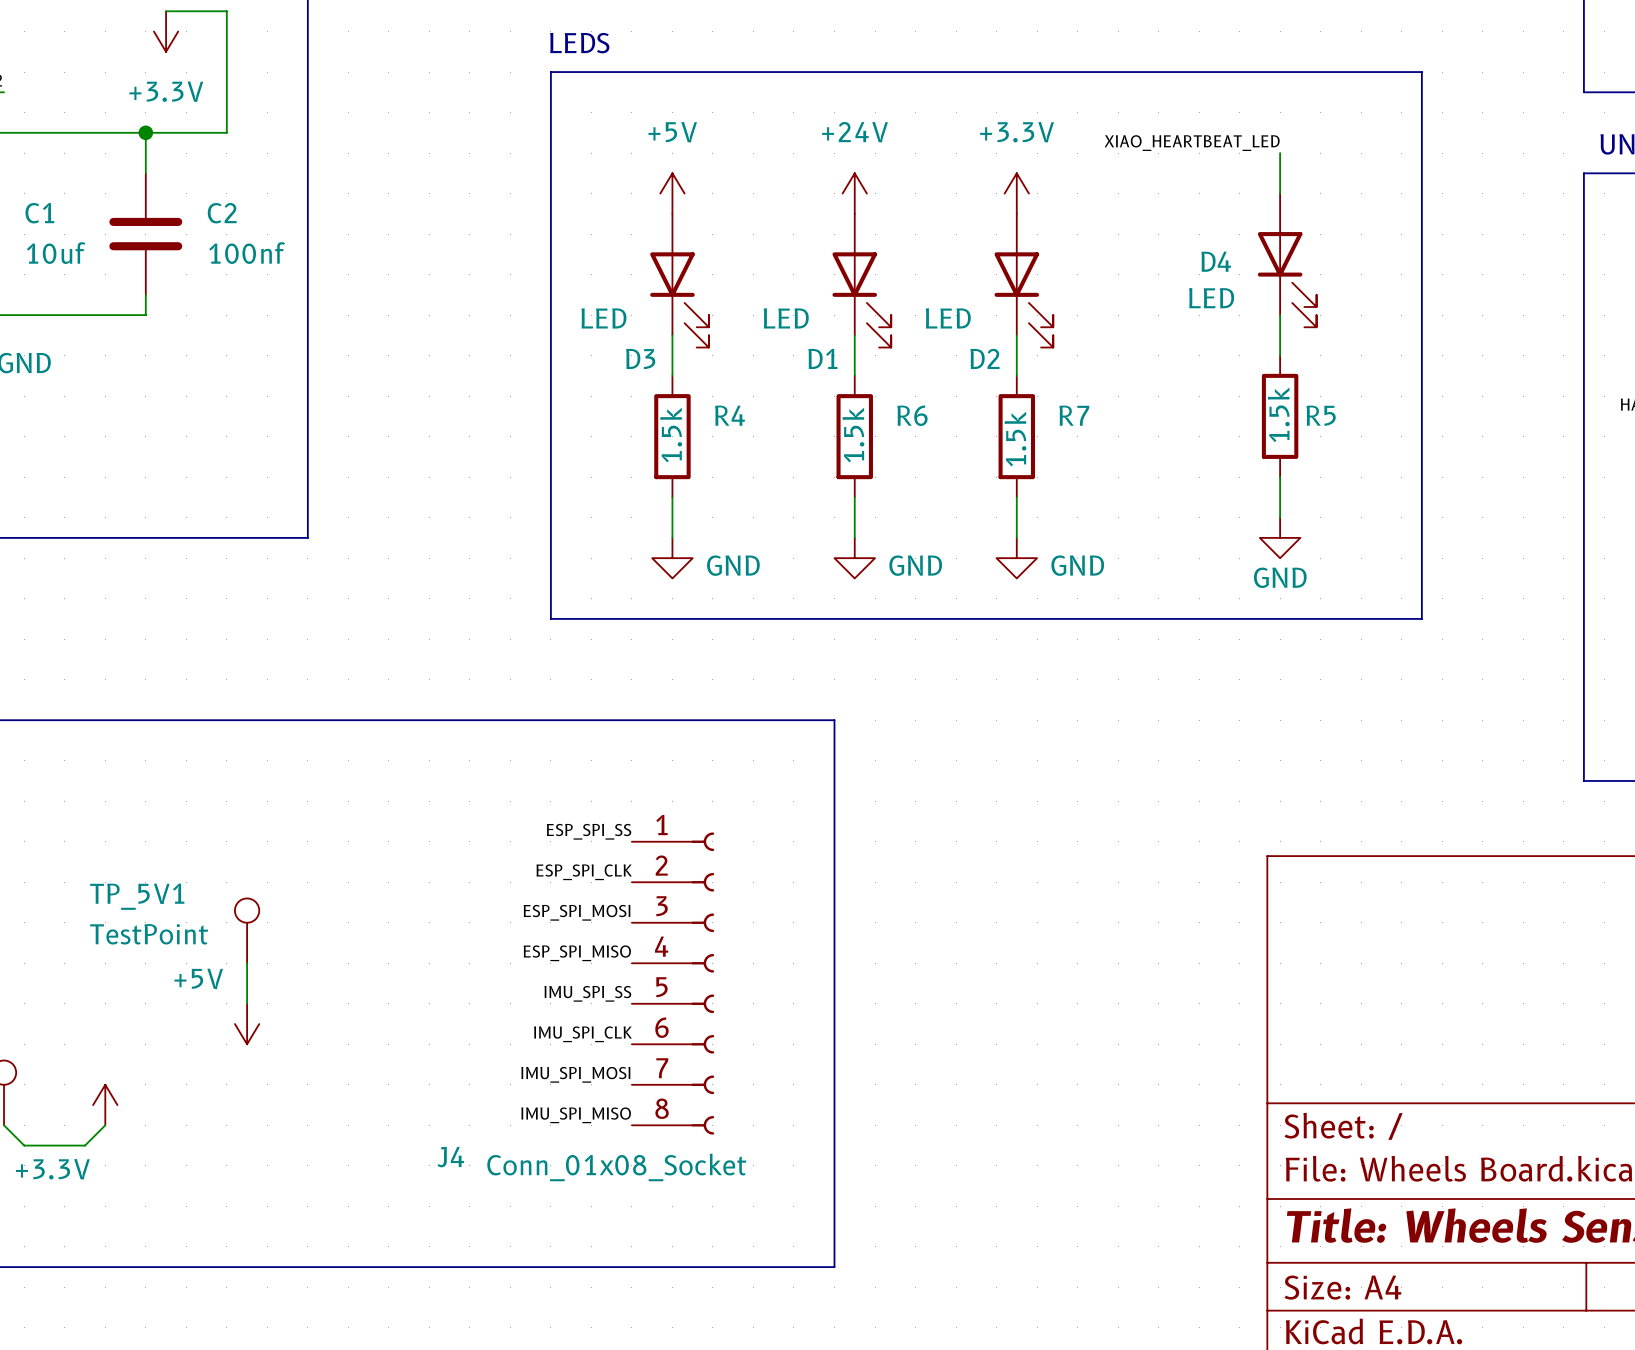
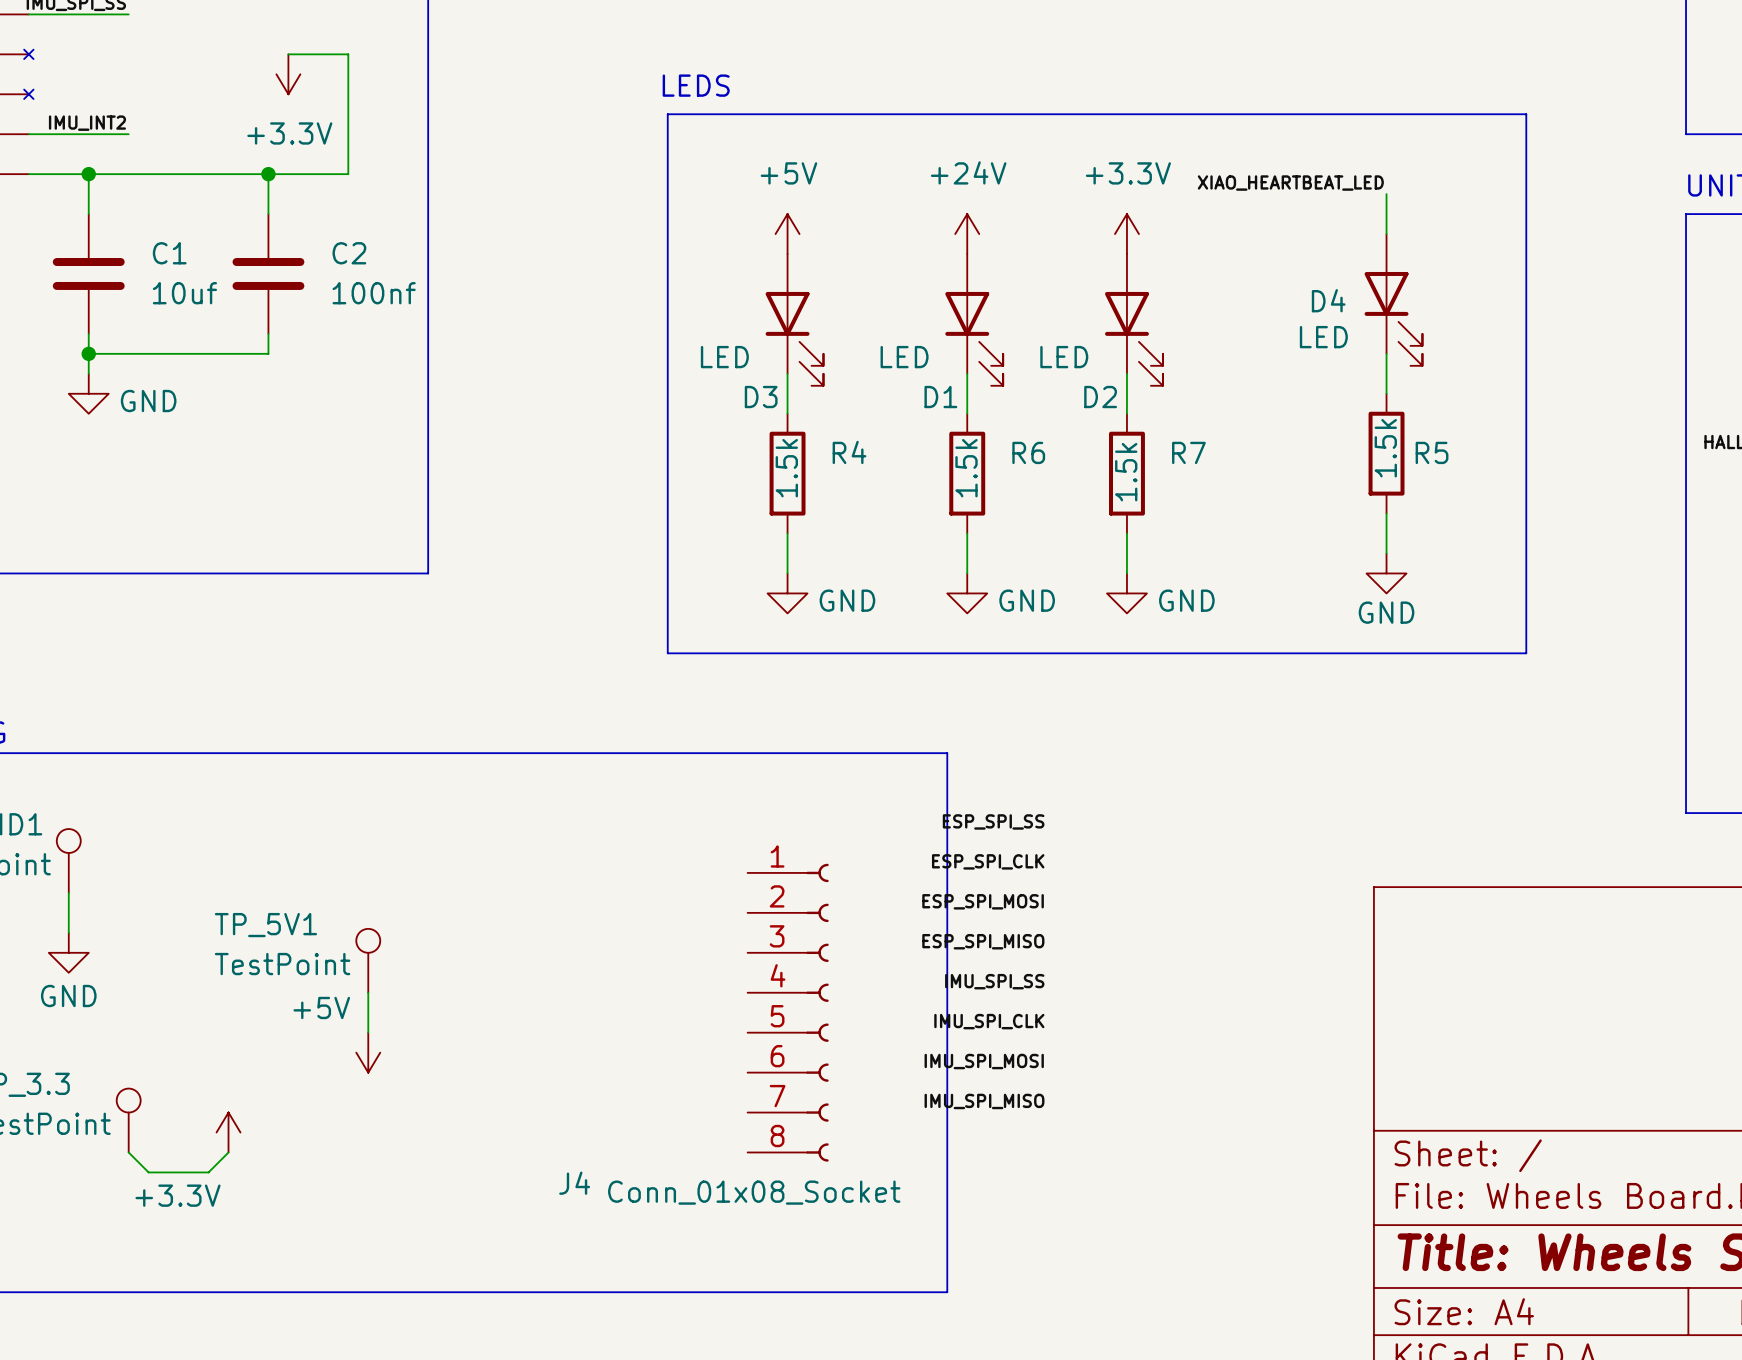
label position: ESP_SPI_SS (589, 831) -> ESP_SPI_SS (993, 821)
label position: ESP_SPI_CLK (584, 872) -> ESP_SPI_CLK (988, 861)
label position: ESP_SPI_MOSI (577, 912) -> ESP_SPI_MOSI (983, 901)
label position: ESP_SPI_MISO (577, 953) -> ESP_SPI_MISO (983, 941)
label position: IMU_SPI_SS (587, 993) -> IMU_SPI_SS (994, 981)
label position: IMU_SPI_CLK (582, 1034) -> IMU_SPI_CLK (989, 1021)
label position: IMU_SPI_MOSI (575, 1074) -> IMU_SPI_MOSI (984, 1061)
label position: IMU_SPI_MISO (576, 1115) -> IMU_SPI_MISO (984, 1101)

